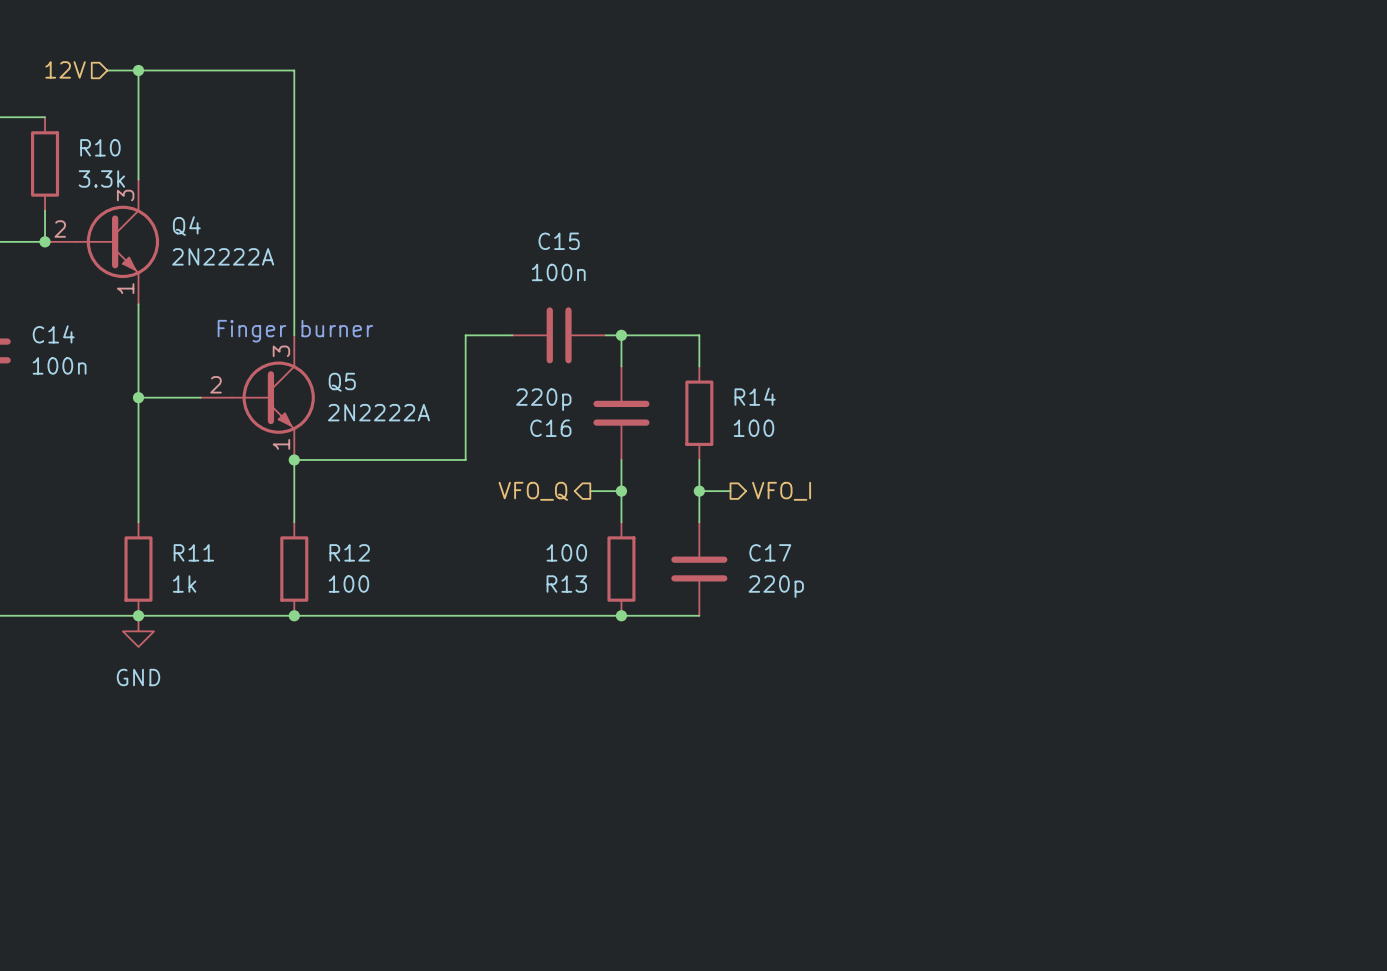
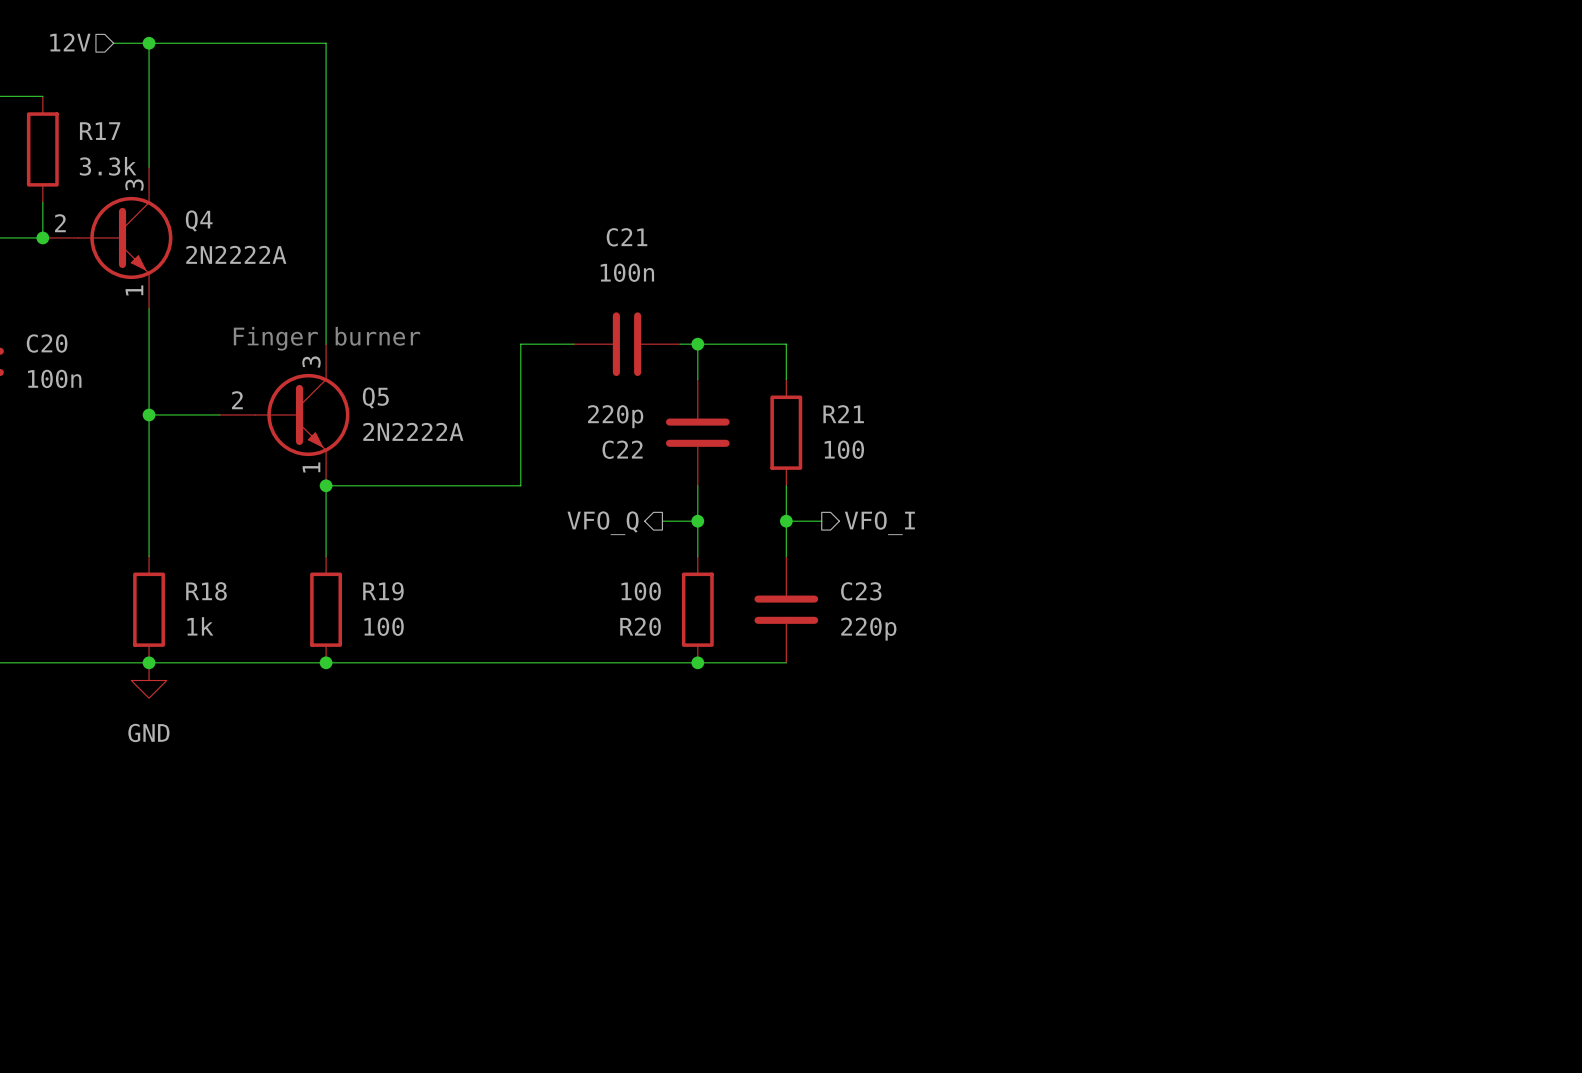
R10 name: R10 (100, 147) -> R17 (100, 131)
C15 name: C15 (559, 241) -> C21 (627, 237)
C14 name: C14 (53, 334) -> C20 (47, 343)
R14 name: R14 (755, 396) -> R21 (843, 414)
C16 name: C16 (550, 428) -> C22 (622, 449)
R11 name: R11 (193, 552) -> R18 (206, 591)
R12 name: R12 (349, 552) -> R19 (383, 591)
C17 name: C17 (770, 552) -> C23 (861, 591)
R13 name: R13 (566, 584) -> R20 (640, 626)

